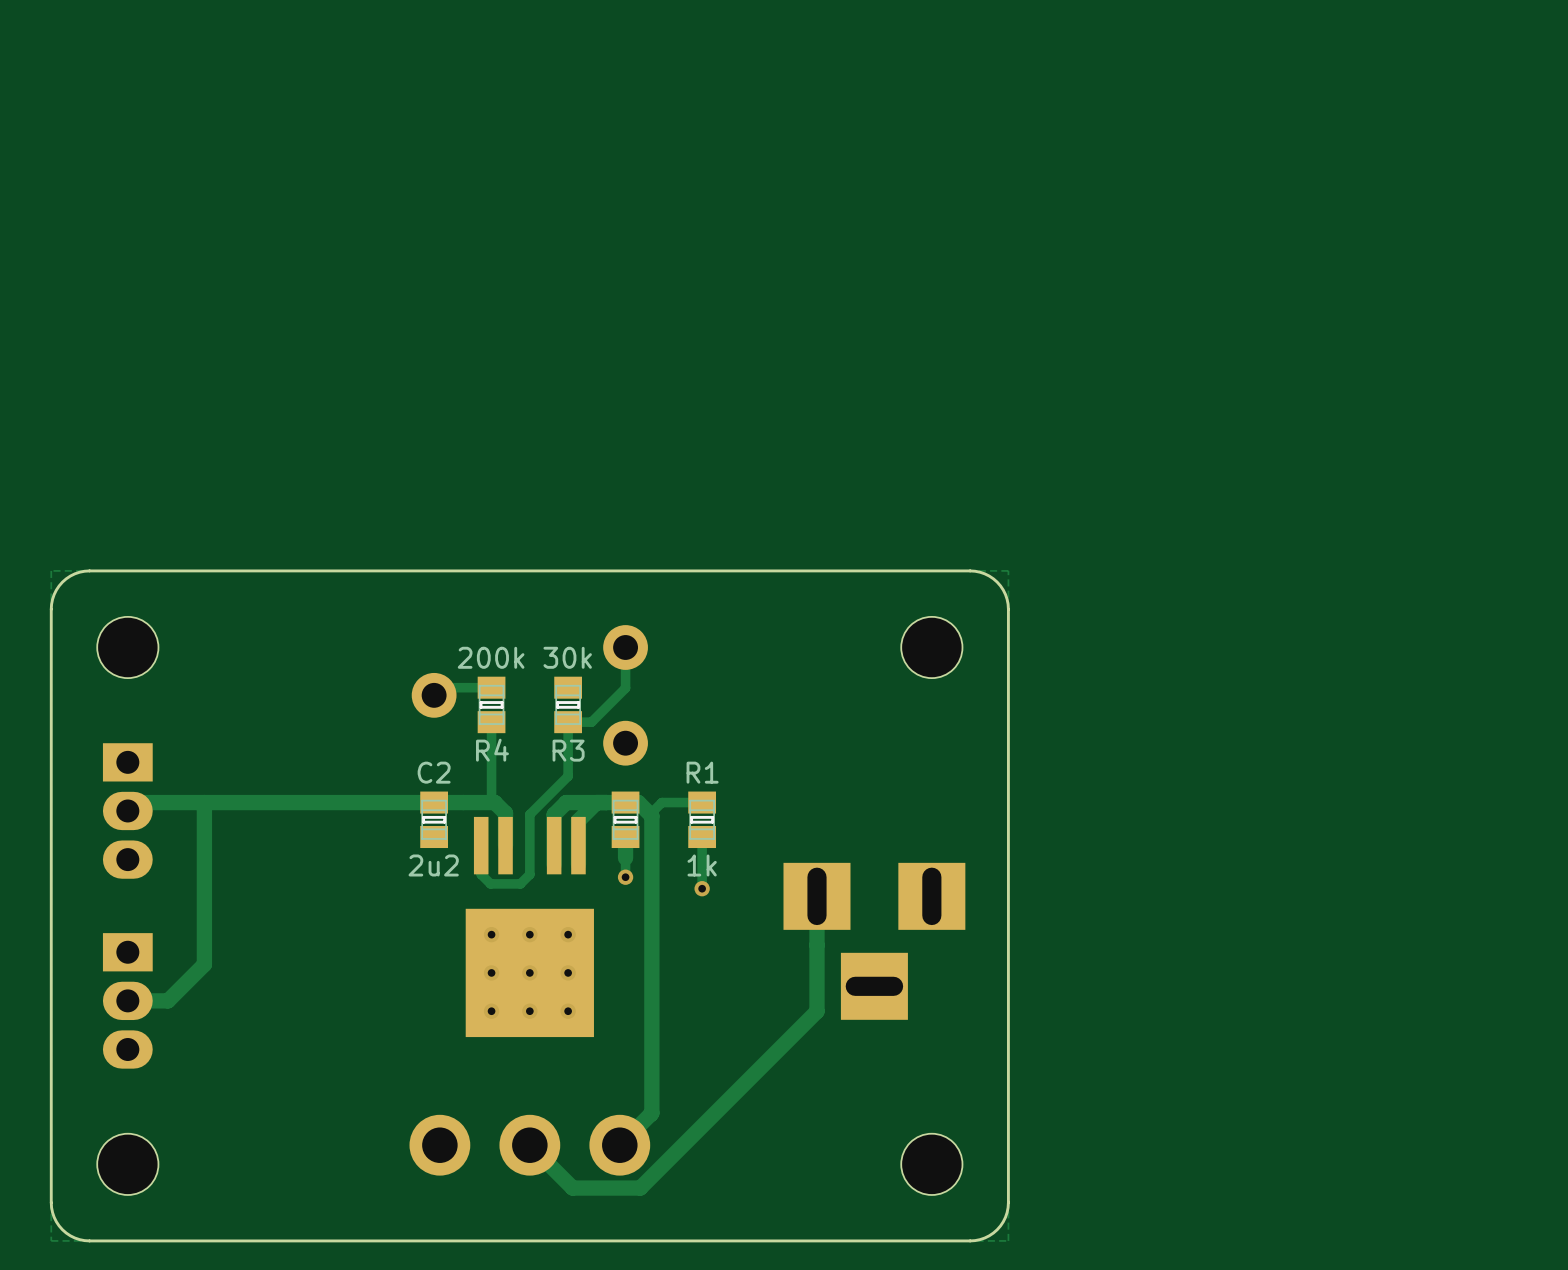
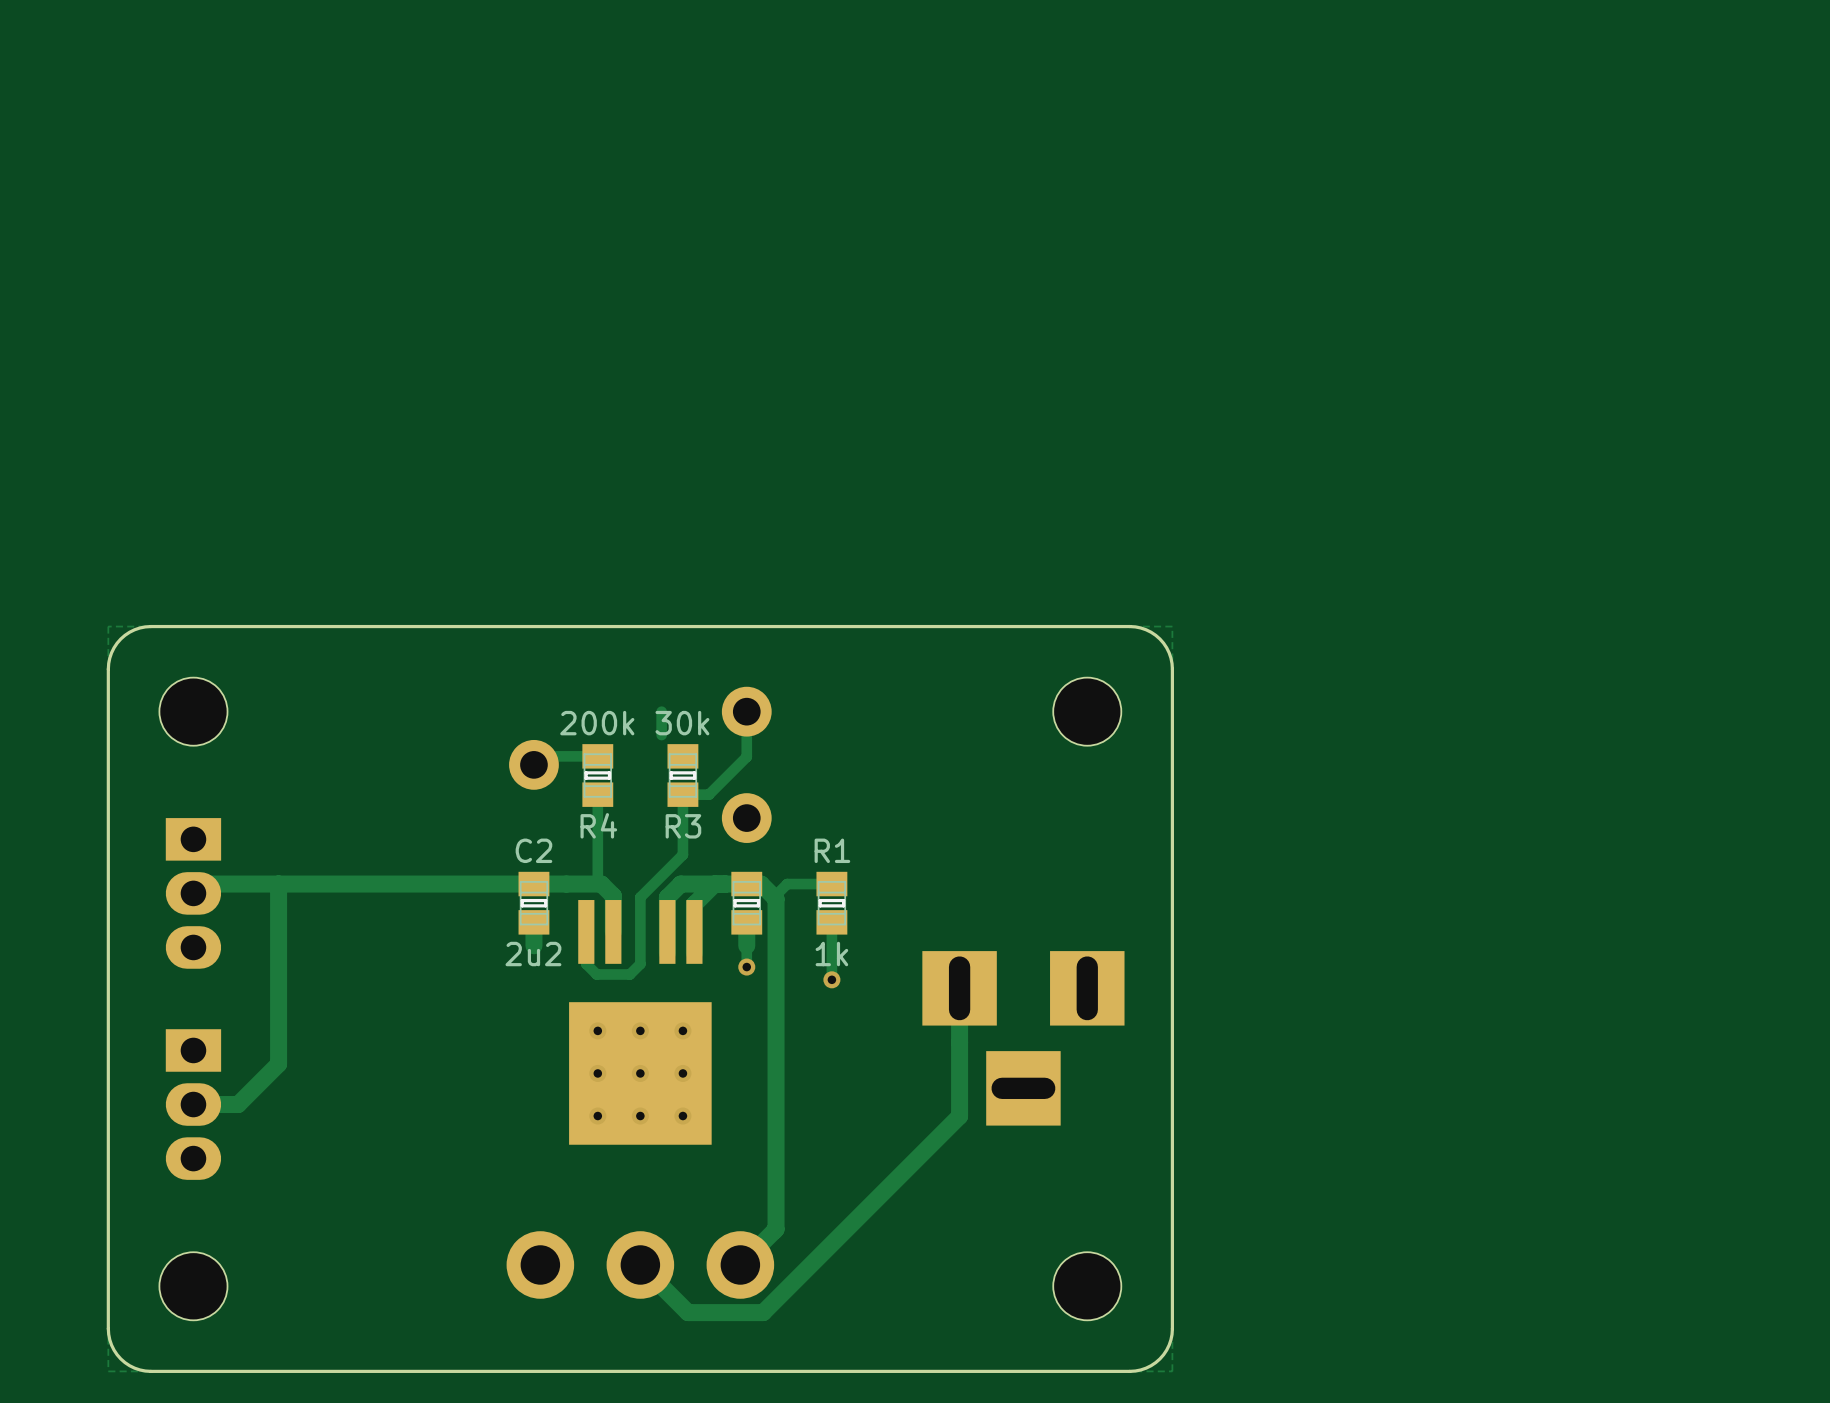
track: none -> (661, 711) (661, 735)
track: none -> (533, 922) (533, 945)

